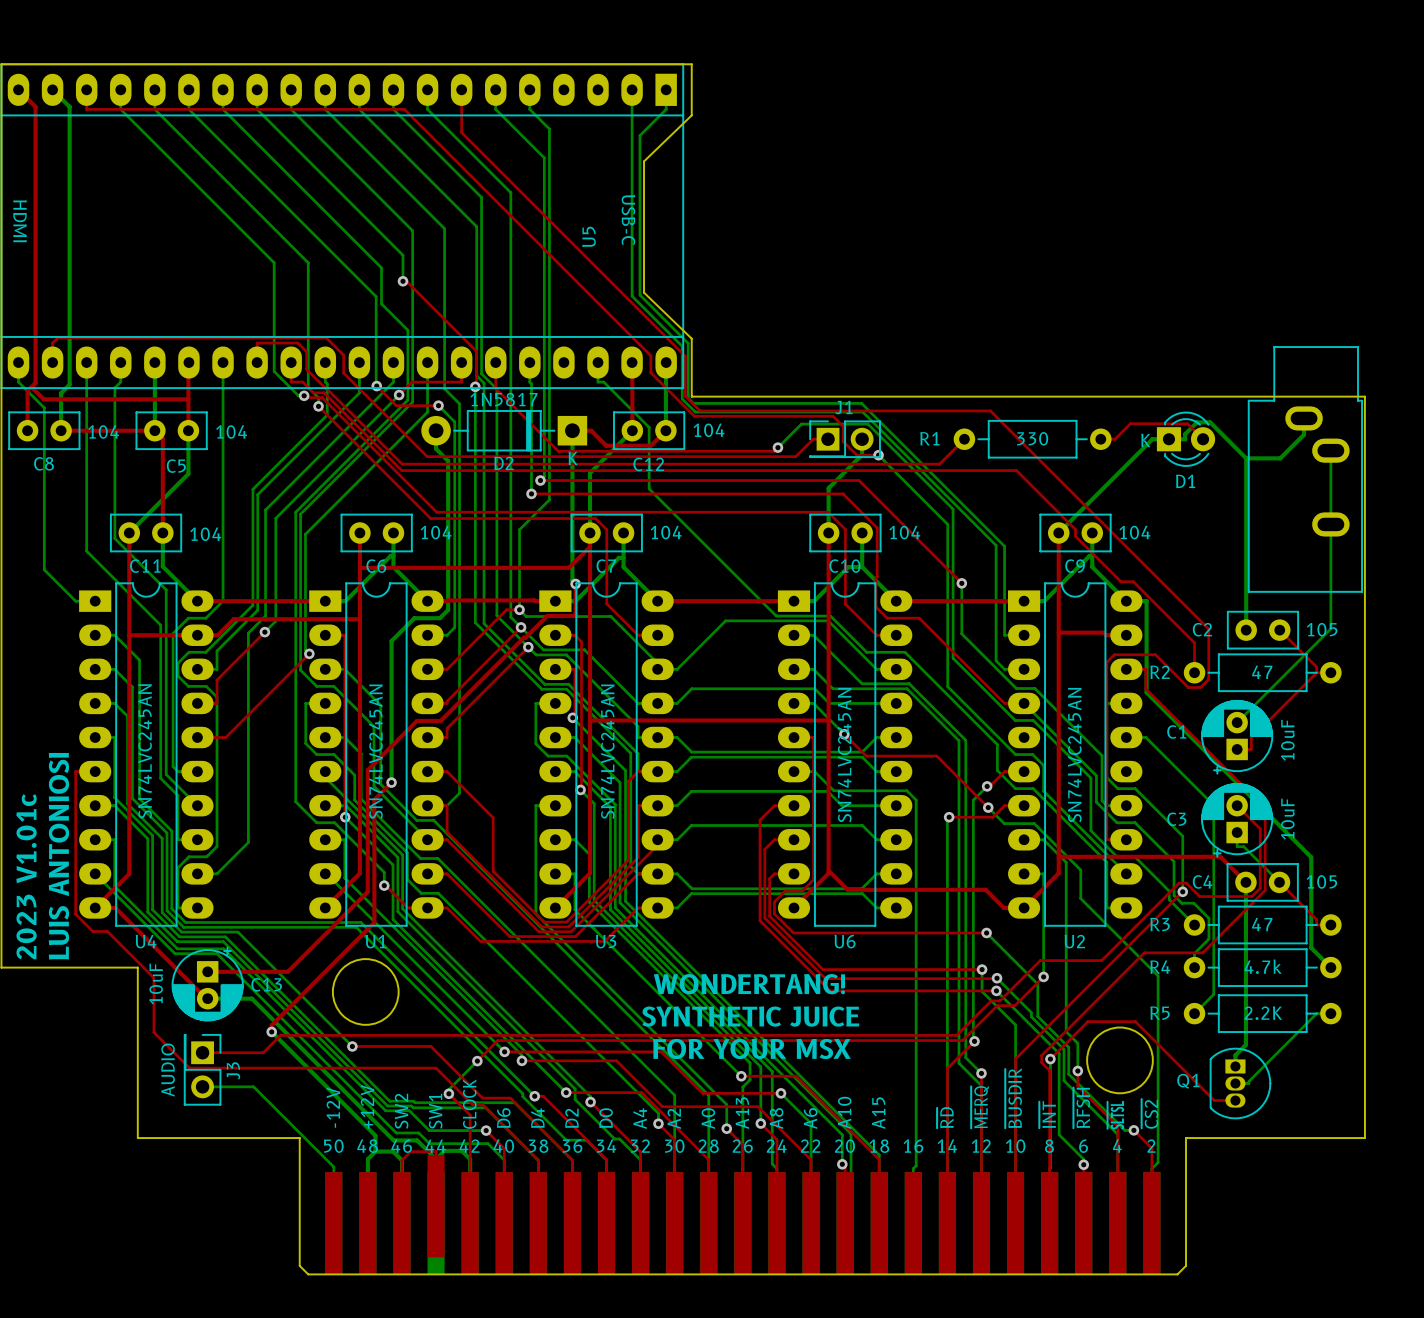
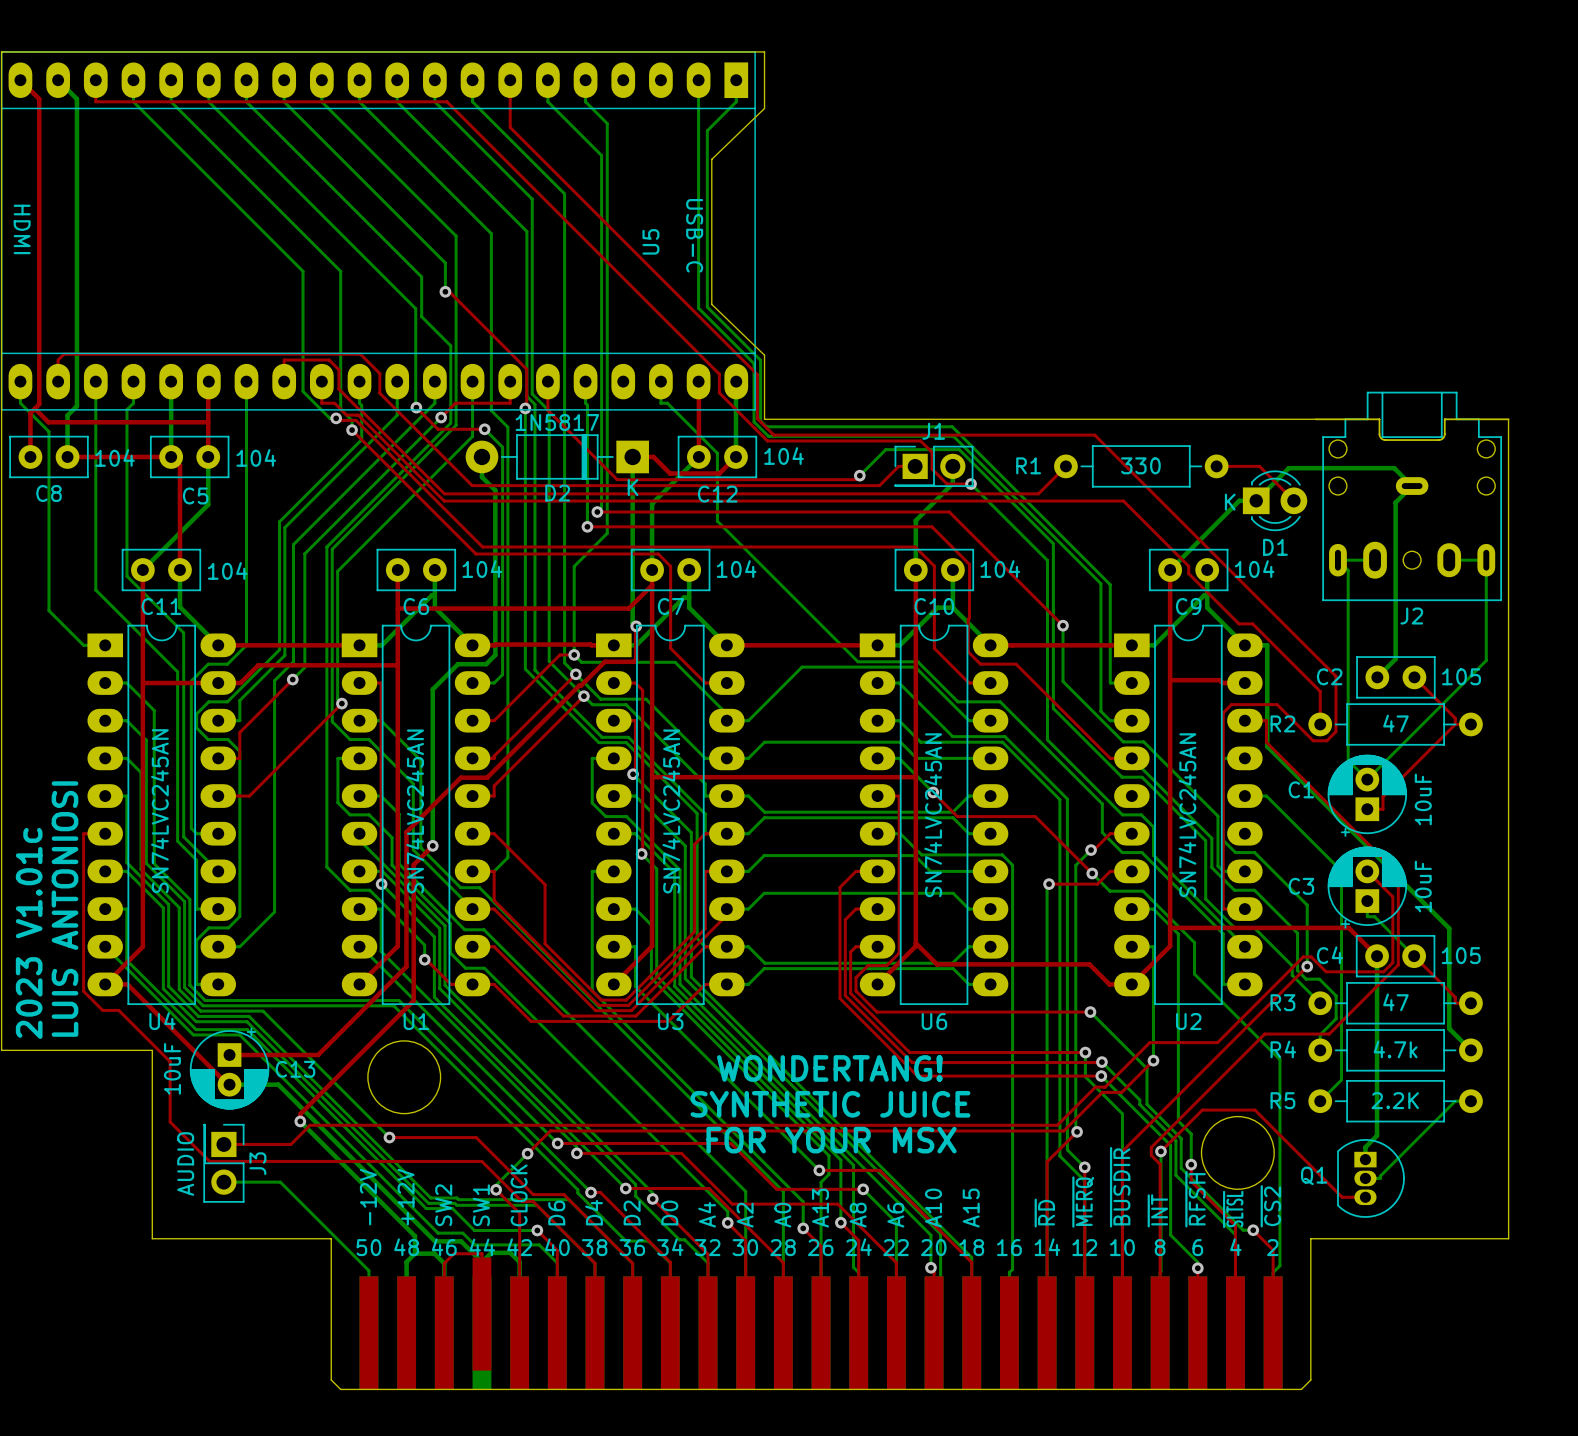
board edge: (1190, 396) (1364, 396) -> none
bottom track: (1304, 418) (1304, 434) (1280, 458) (1246, 458) -> none
top track: (1114, 439) (1130, 423) (1187, 423) (1203, 439) -> (1232, 466) (1259, 466) (1293, 500)
D1 position: (1186, 439) -> (1275, 500)
bottom track: (1330, 450) (1330, 628) -> (1449, 560) (1486, 560) (1486, 660) (1470, 675)
bottom track: (1246, 458) (1246, 630) -> (1239, 500) (1256, 500) (1288, 468) (1394, 468) (1412, 486) (1395, 502) (1395, 659) (1377, 677)
bottom track: (1246, 458) (1210, 422) (1196, 422) (1185, 434) (1185, 439) (1152, 439) (1121, 470) -> none
J2: none -> (1412, 496)
part: (1305, 469) -> none
bottom track: none -> (1375, 560) (1337, 560) (1348, 570) (1348, 760) (1367, 779)

